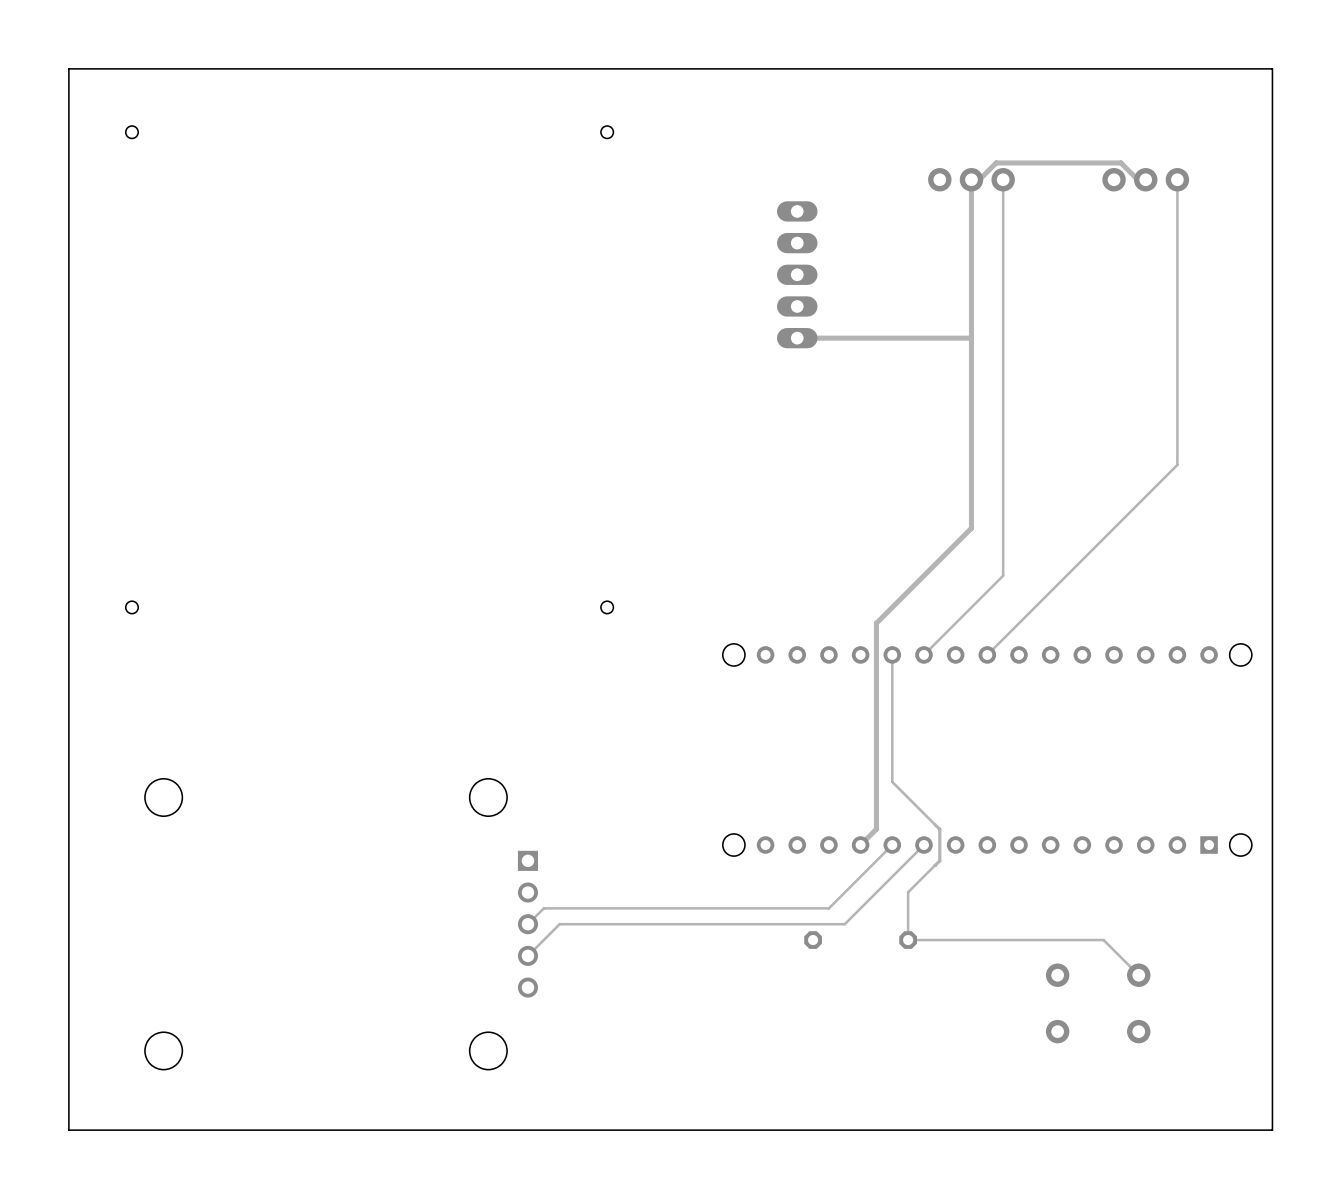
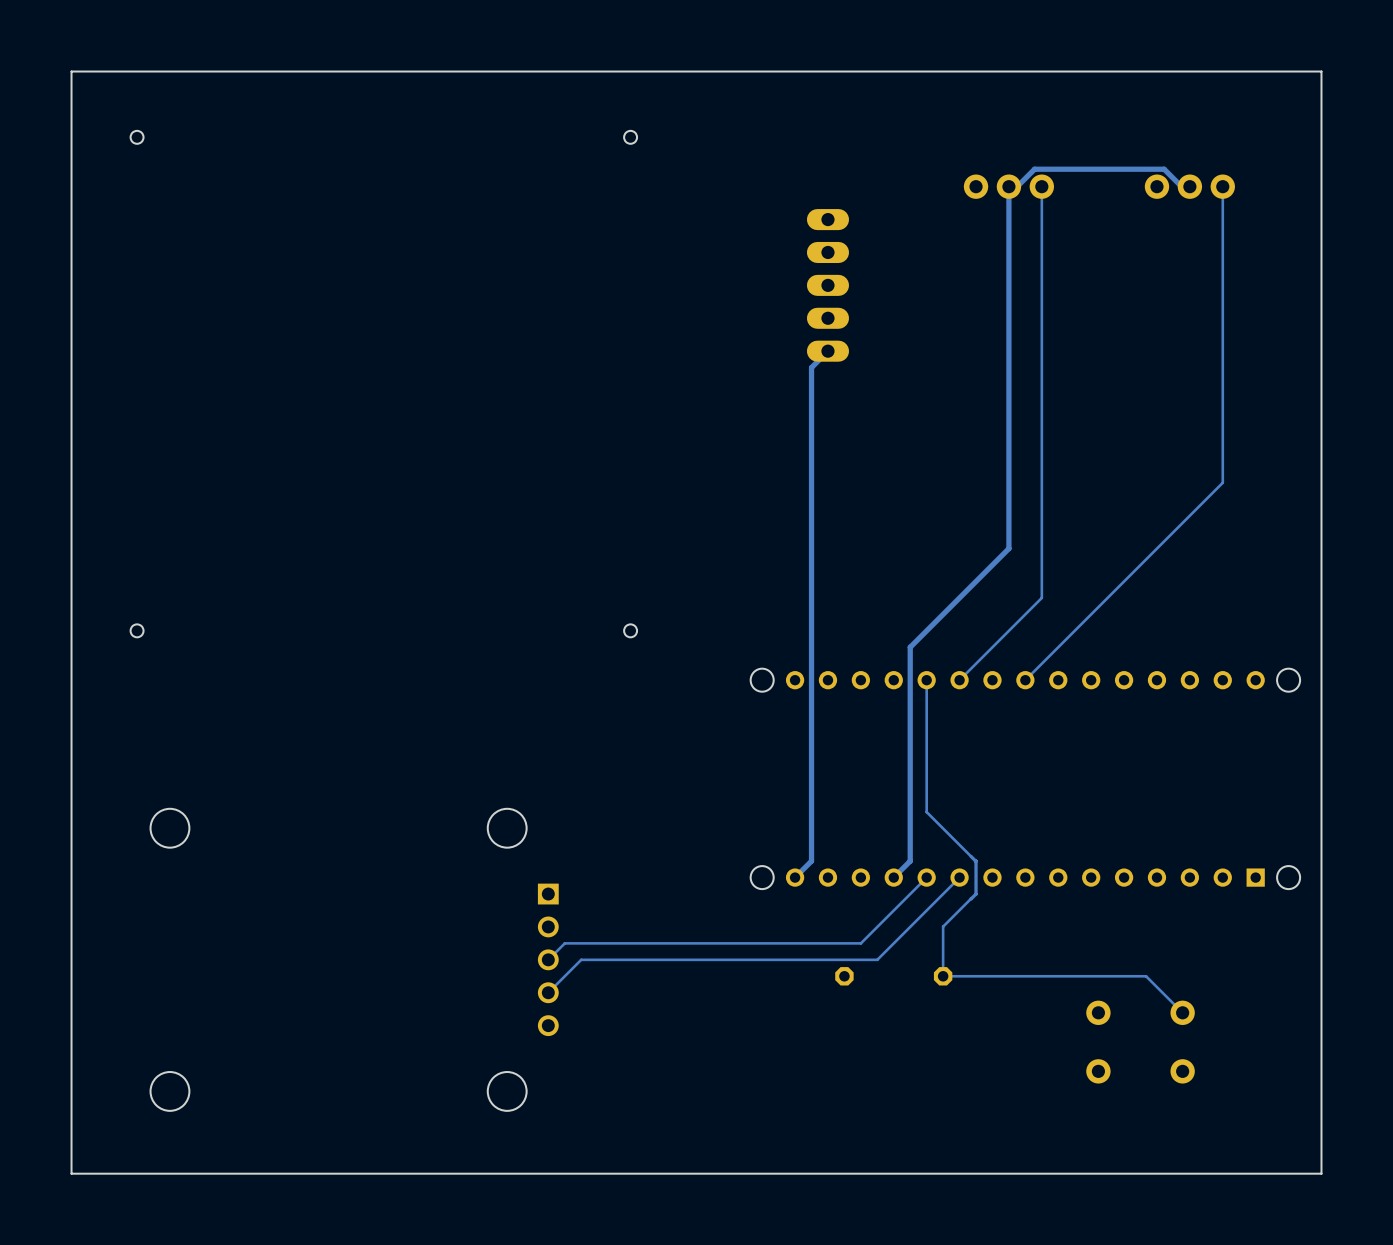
track: (971, 338) (797, 338) -> (795, 877) (811, 861) (811, 367) (827, 351)

